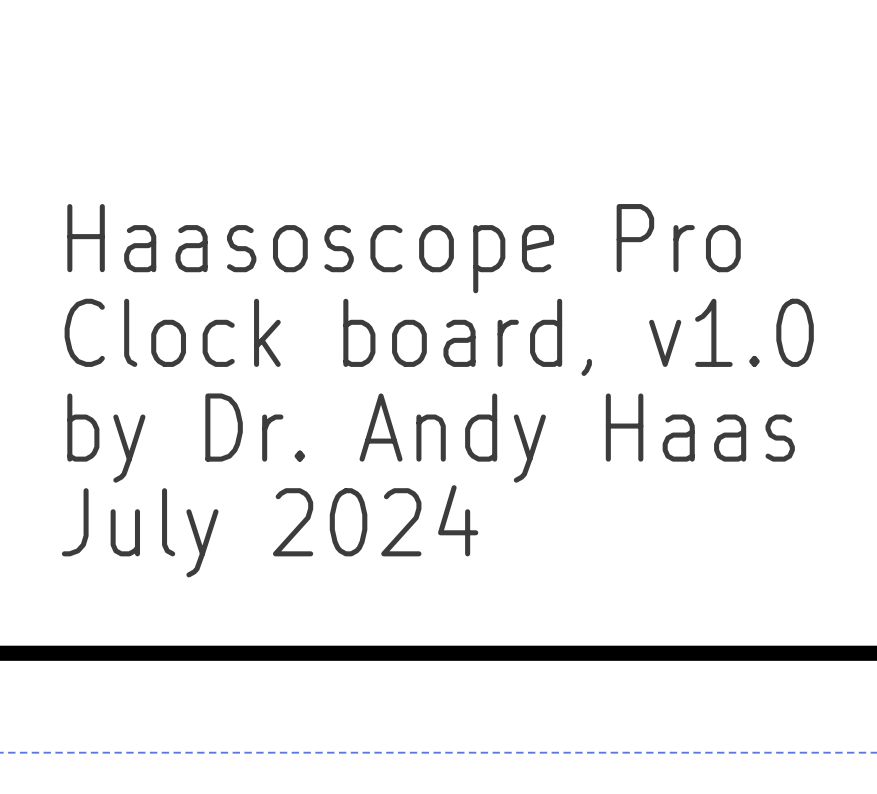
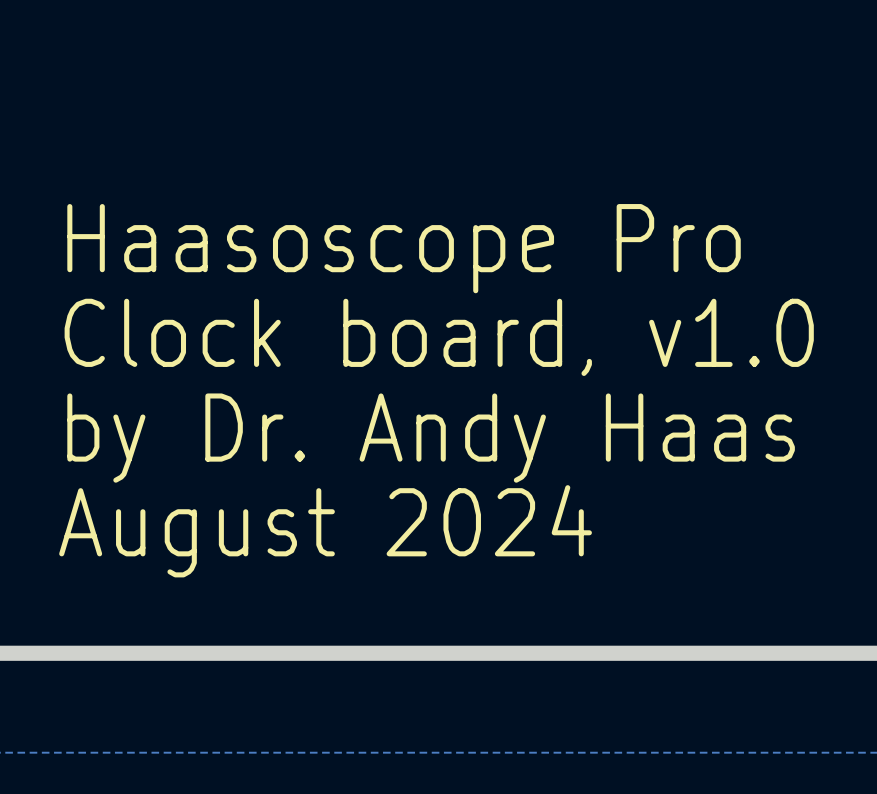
text: July 2024 (270, 531) -> August 2024 (325, 531)

